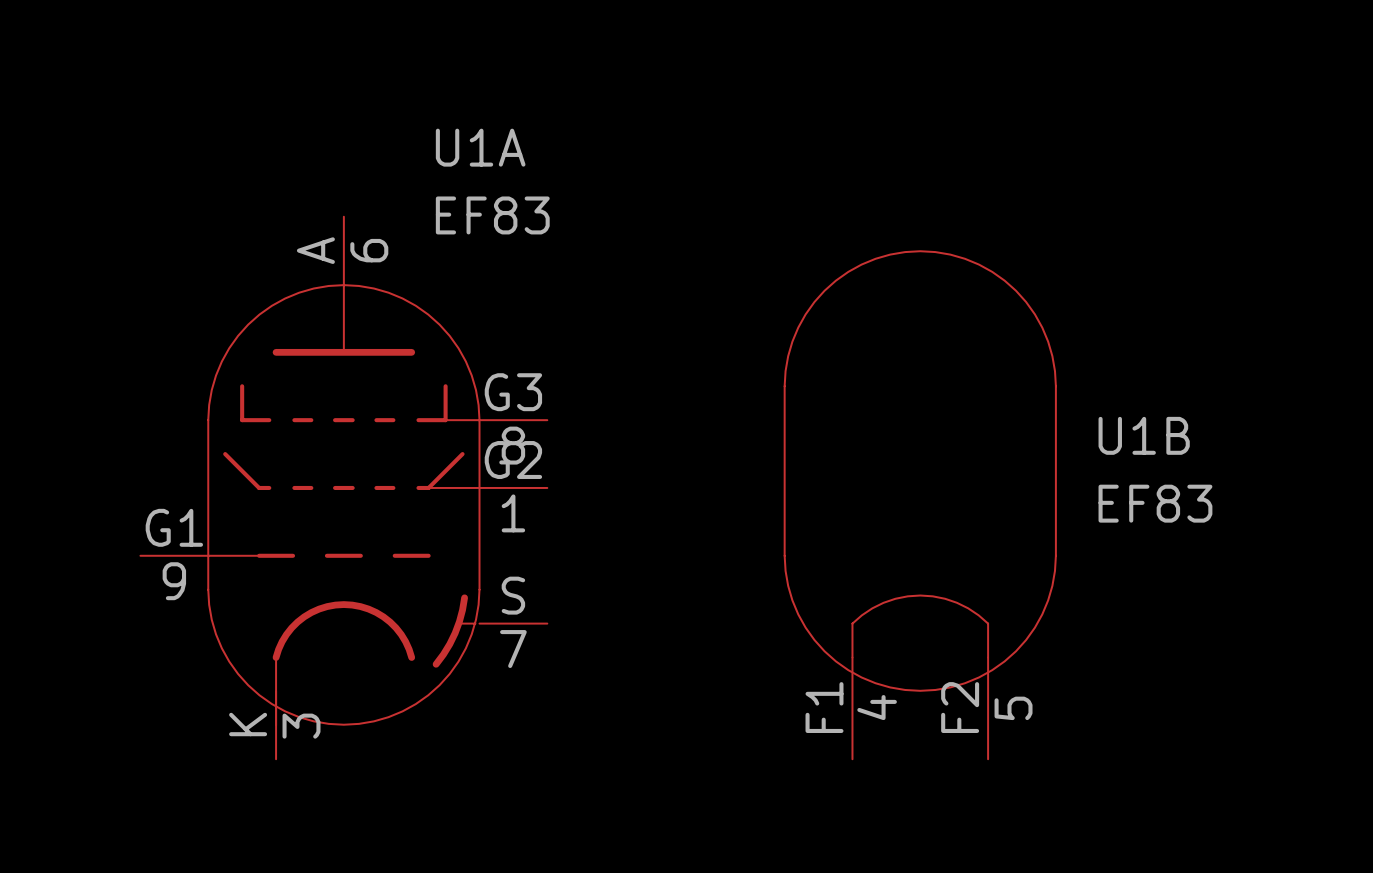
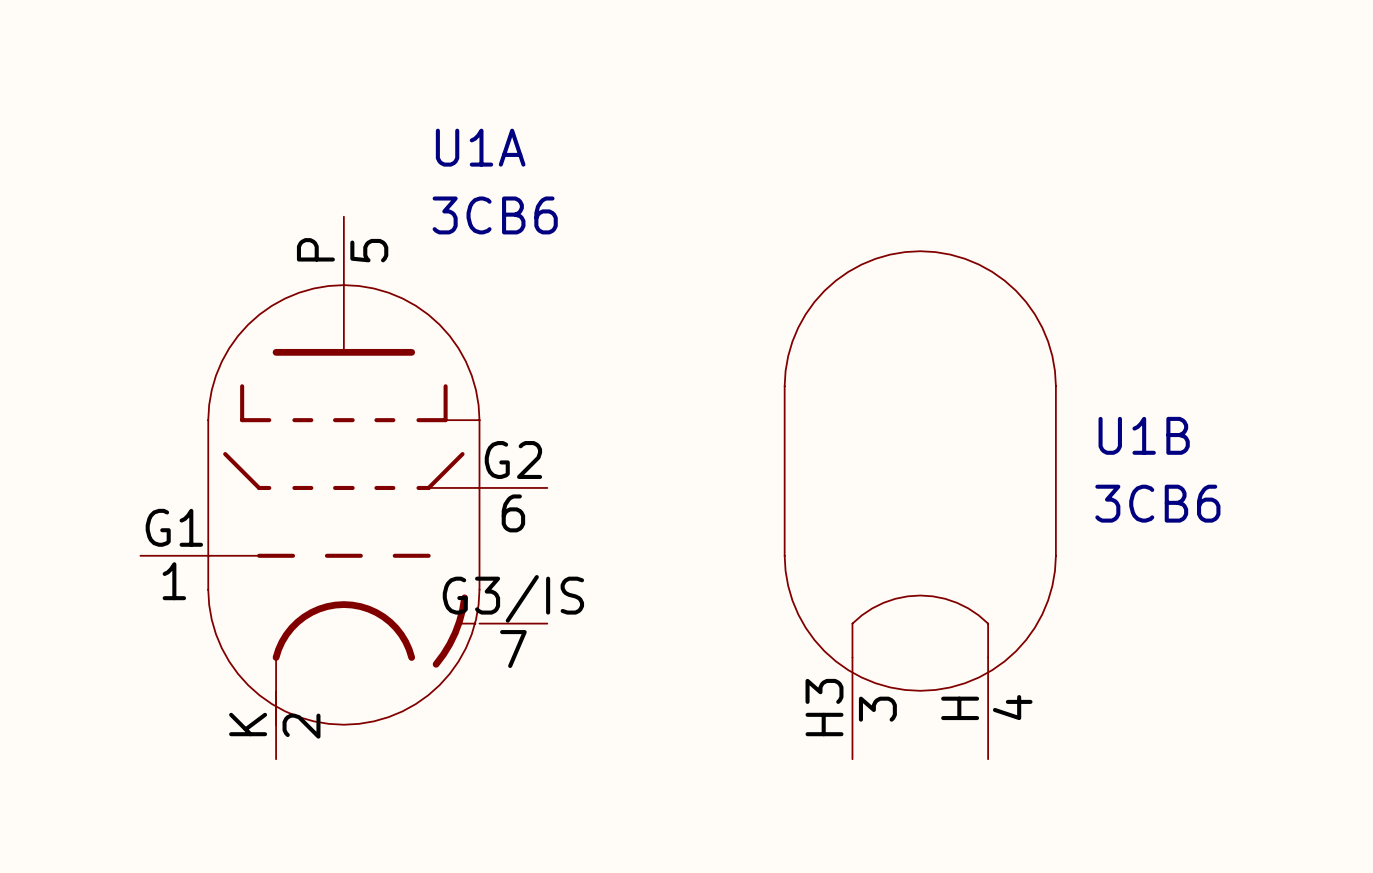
U1A value: EF83 (492, 215) -> 3CB6 (495, 215)
U1A symbol: [140, 216, 548, 760] -> [140, 216, 548, 760]
U1B value: EF83 (1155, 503) -> 3CB6 (1157, 503)
U1B pin name: F1 (824, 707) -> H3 (824, 707)
U1B pin number: 4 (877, 707) -> 3 (877, 709)
U1B pin name: F2 (960, 707) -> H (960, 708)
U1B pin number: 5 (1013, 708) -> 4 (1012, 707)

